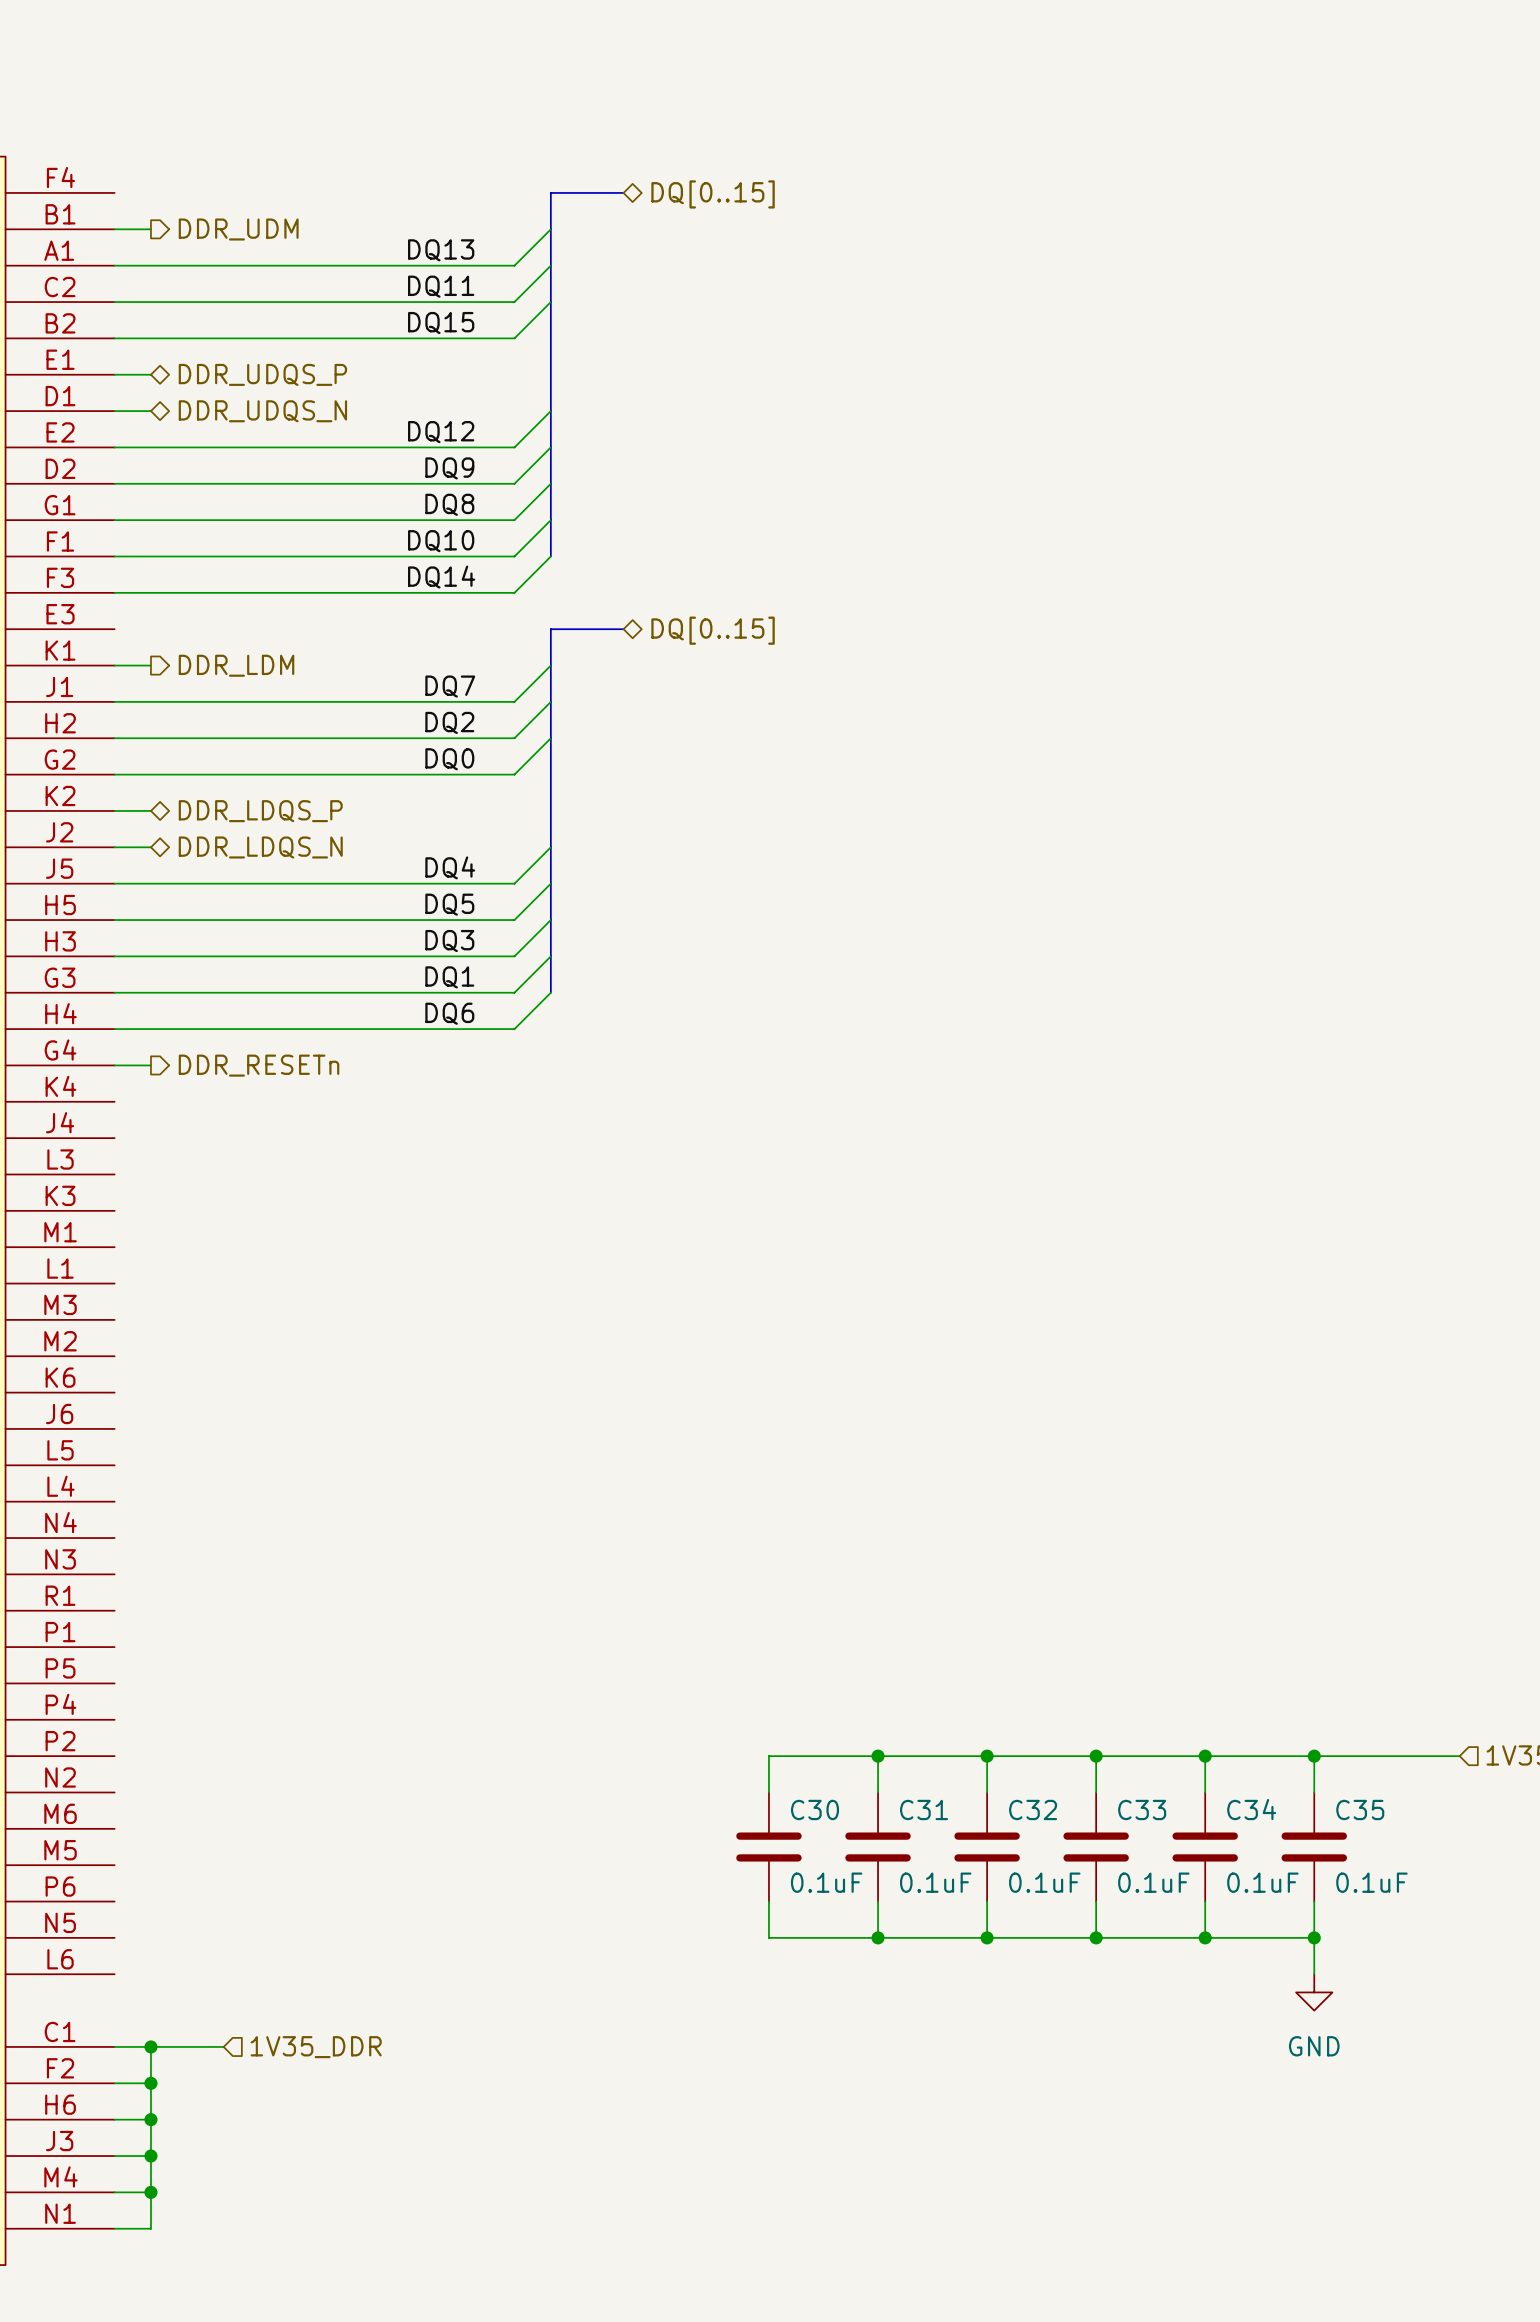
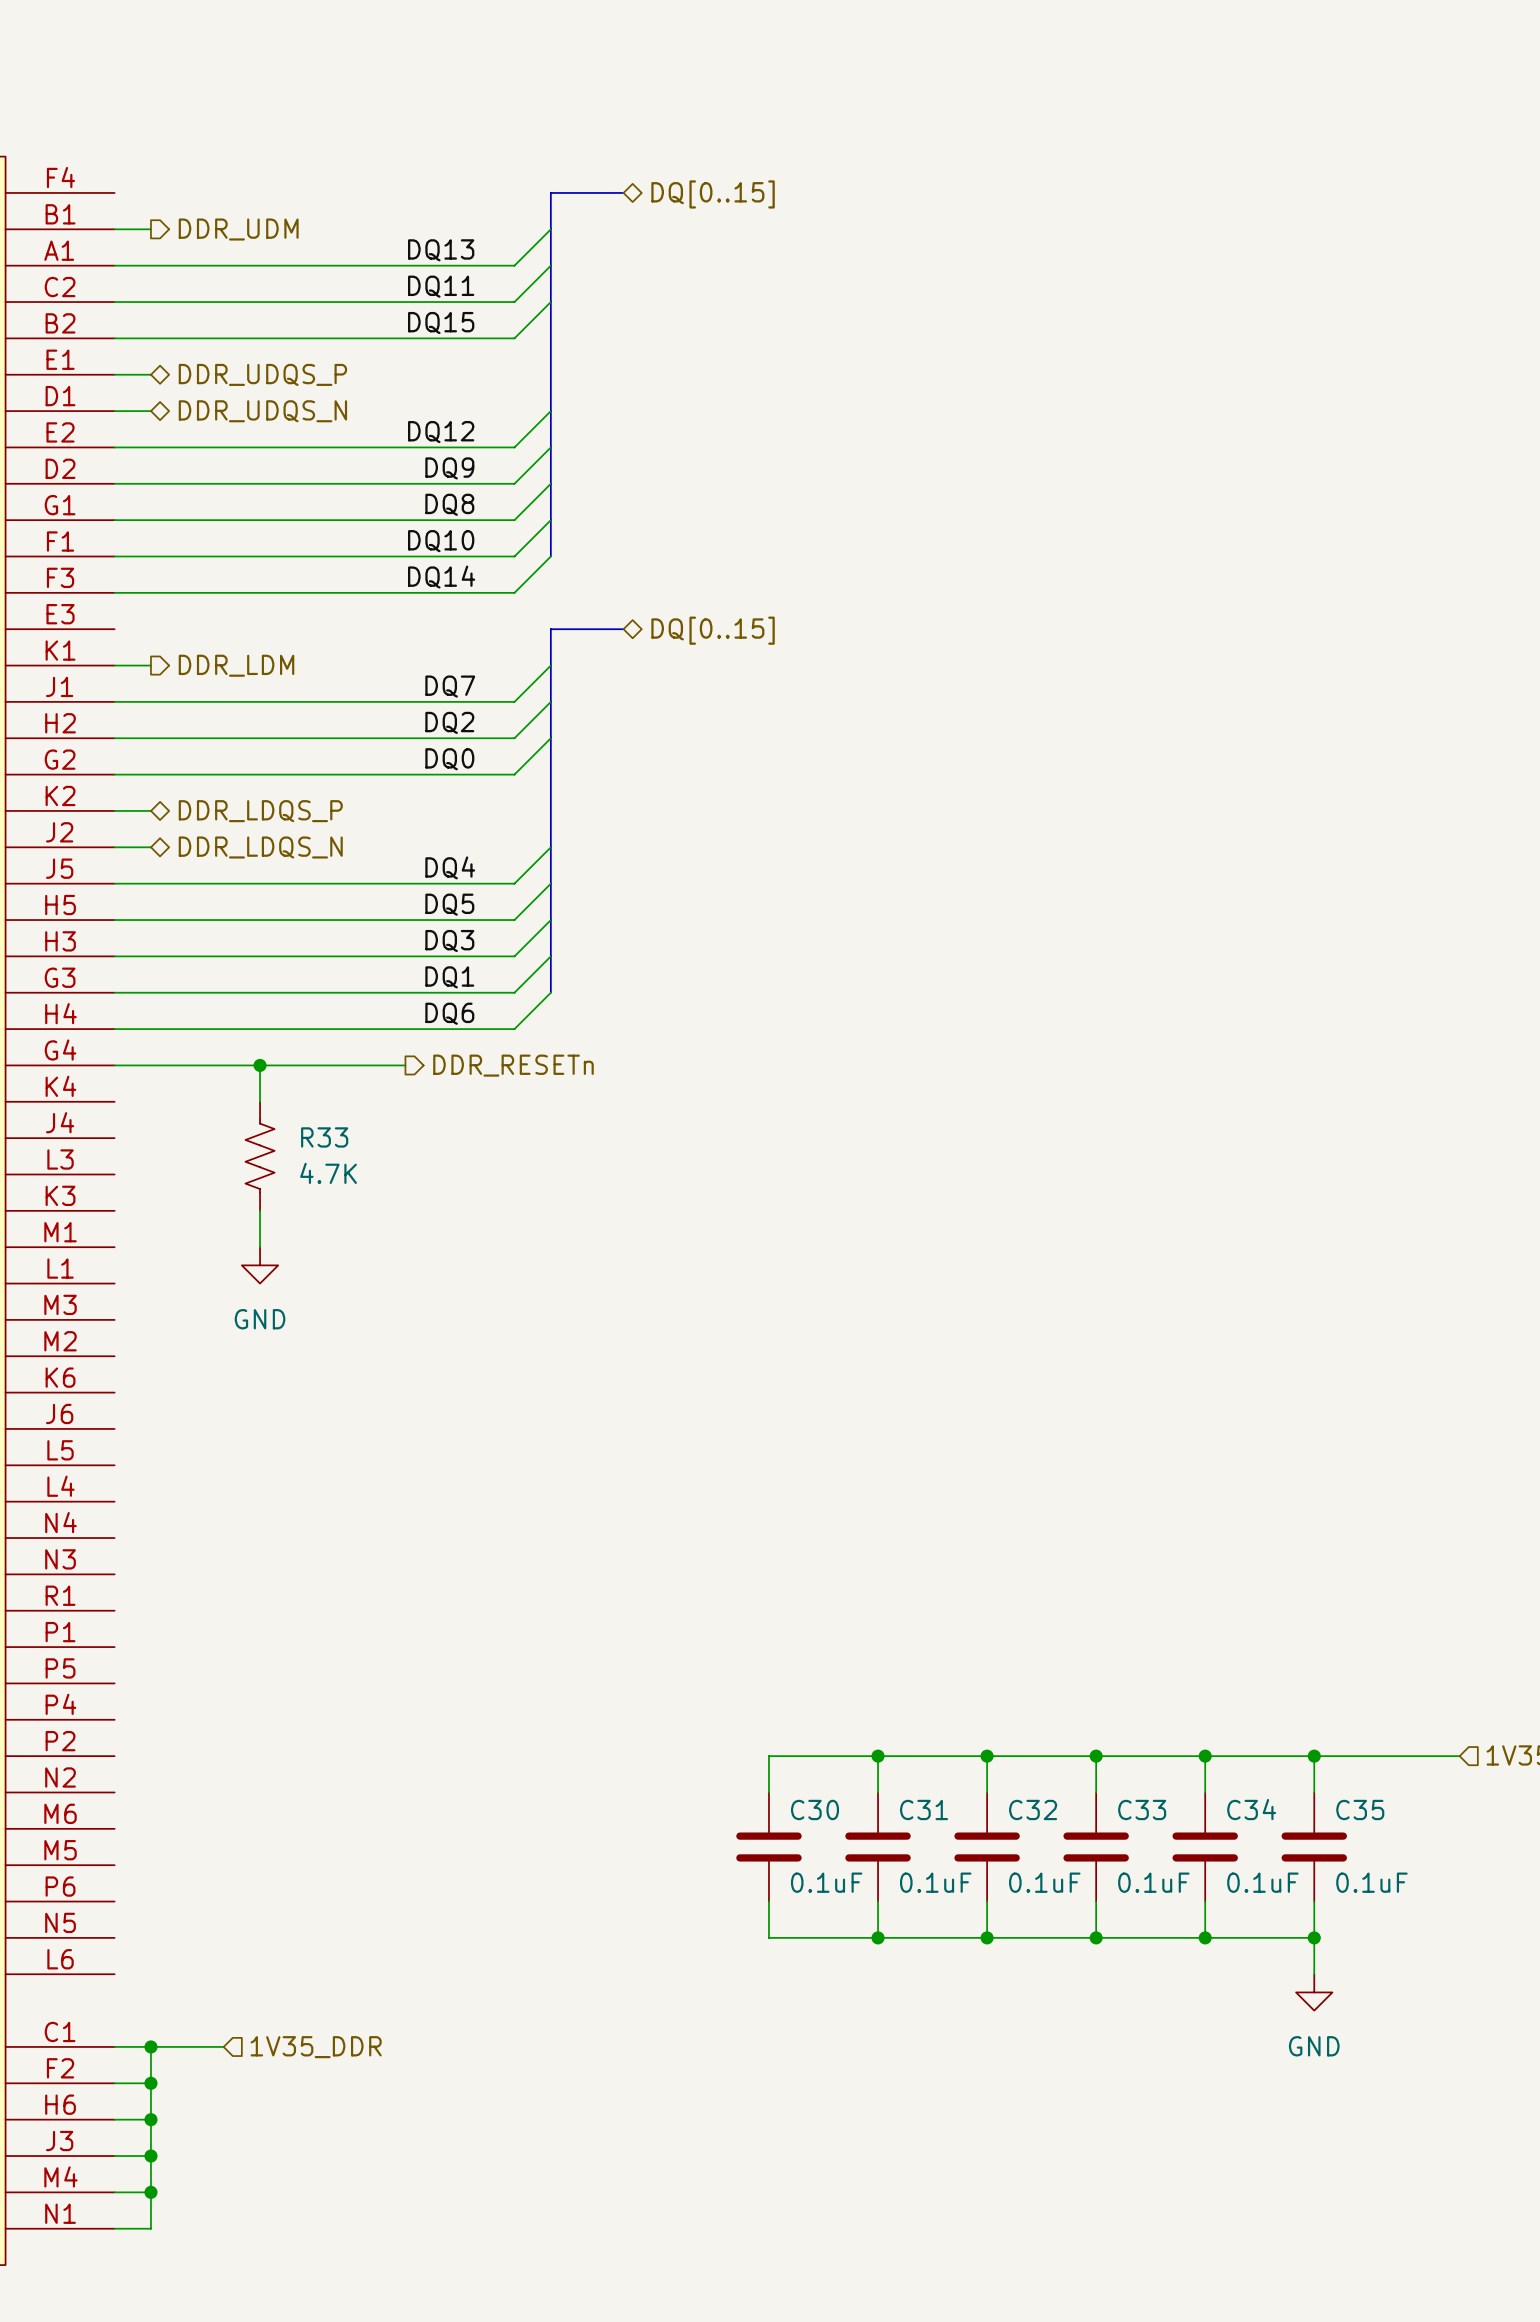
wire: none -> (150, 1065) (405, 1065)
hierarchical label position: DDR_RESETn (259, 1065) -> DDR_RESETn (513, 1065)
wire: none -> (260, 1065) (260, 1101)
junction: none -> (260, 1065)
R33: none -> 4.7K (260, 1156)
wire: none -> (260, 1210) (260, 1247)
power symbol: none -> GND (260, 1265)

